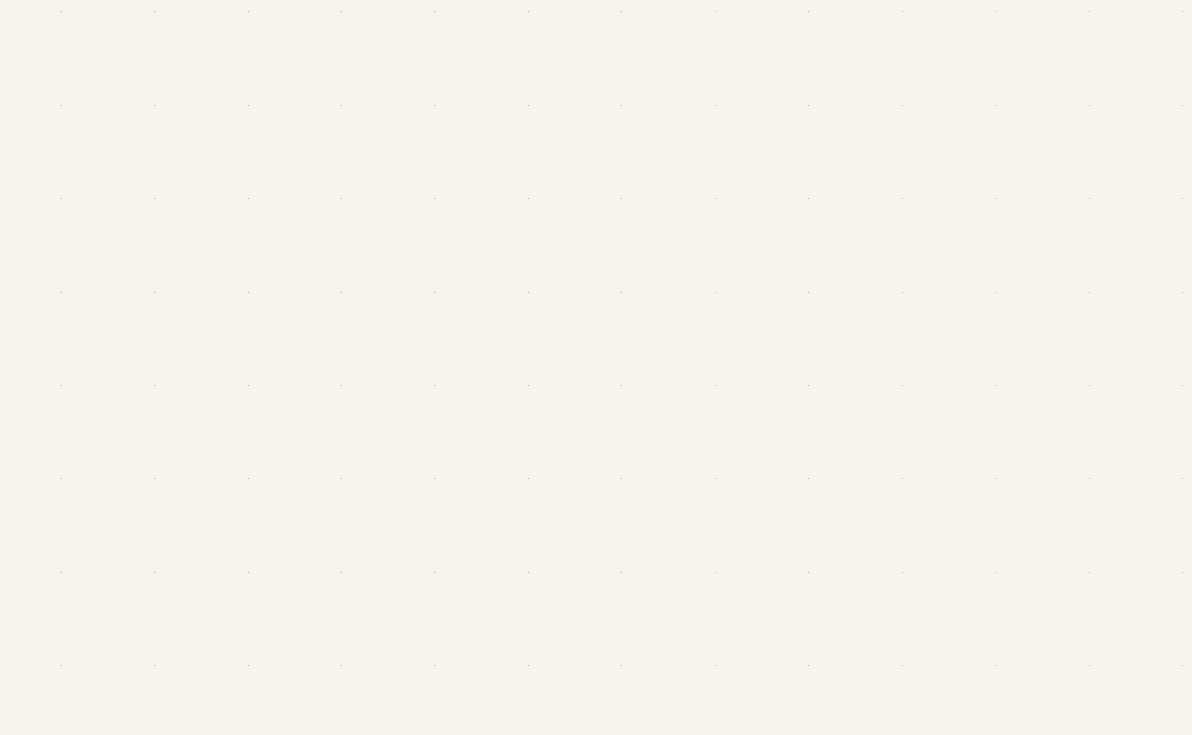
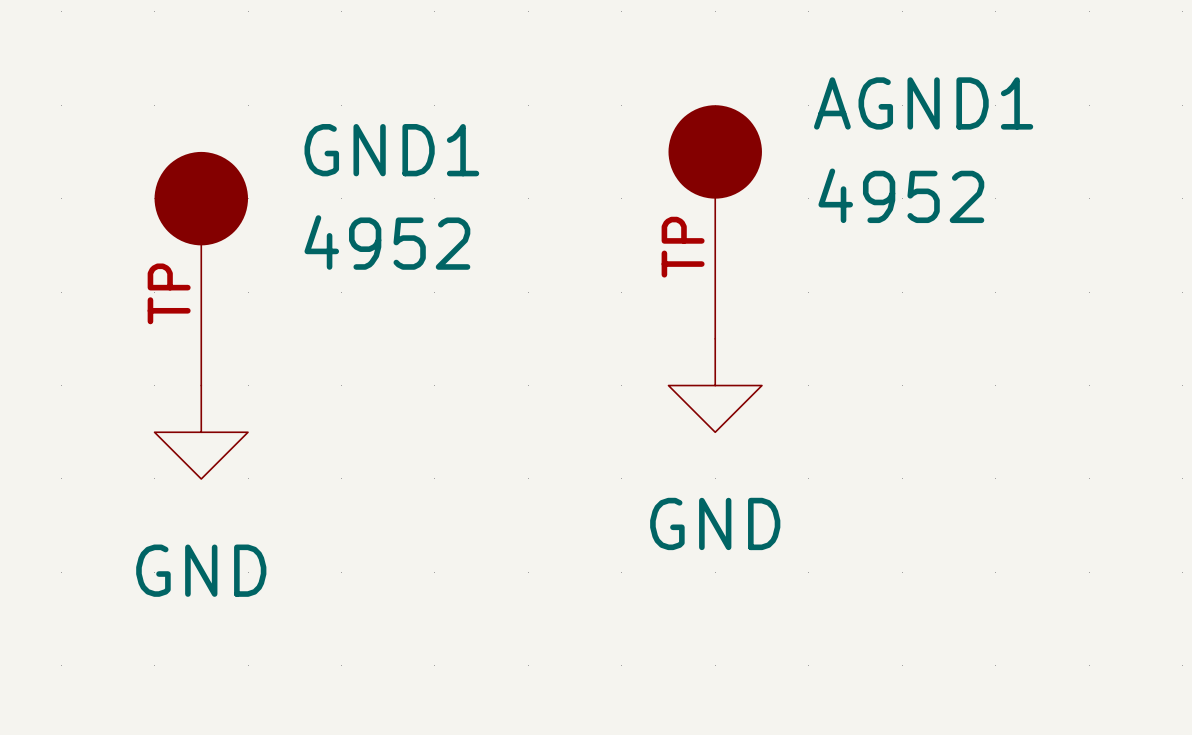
AGND1: none -> 4952 (715, 222)
GND1: none -> 4952 (201, 268)
power symbol: none -> GND (715, 385)
power symbol: none -> GND (201, 432)

